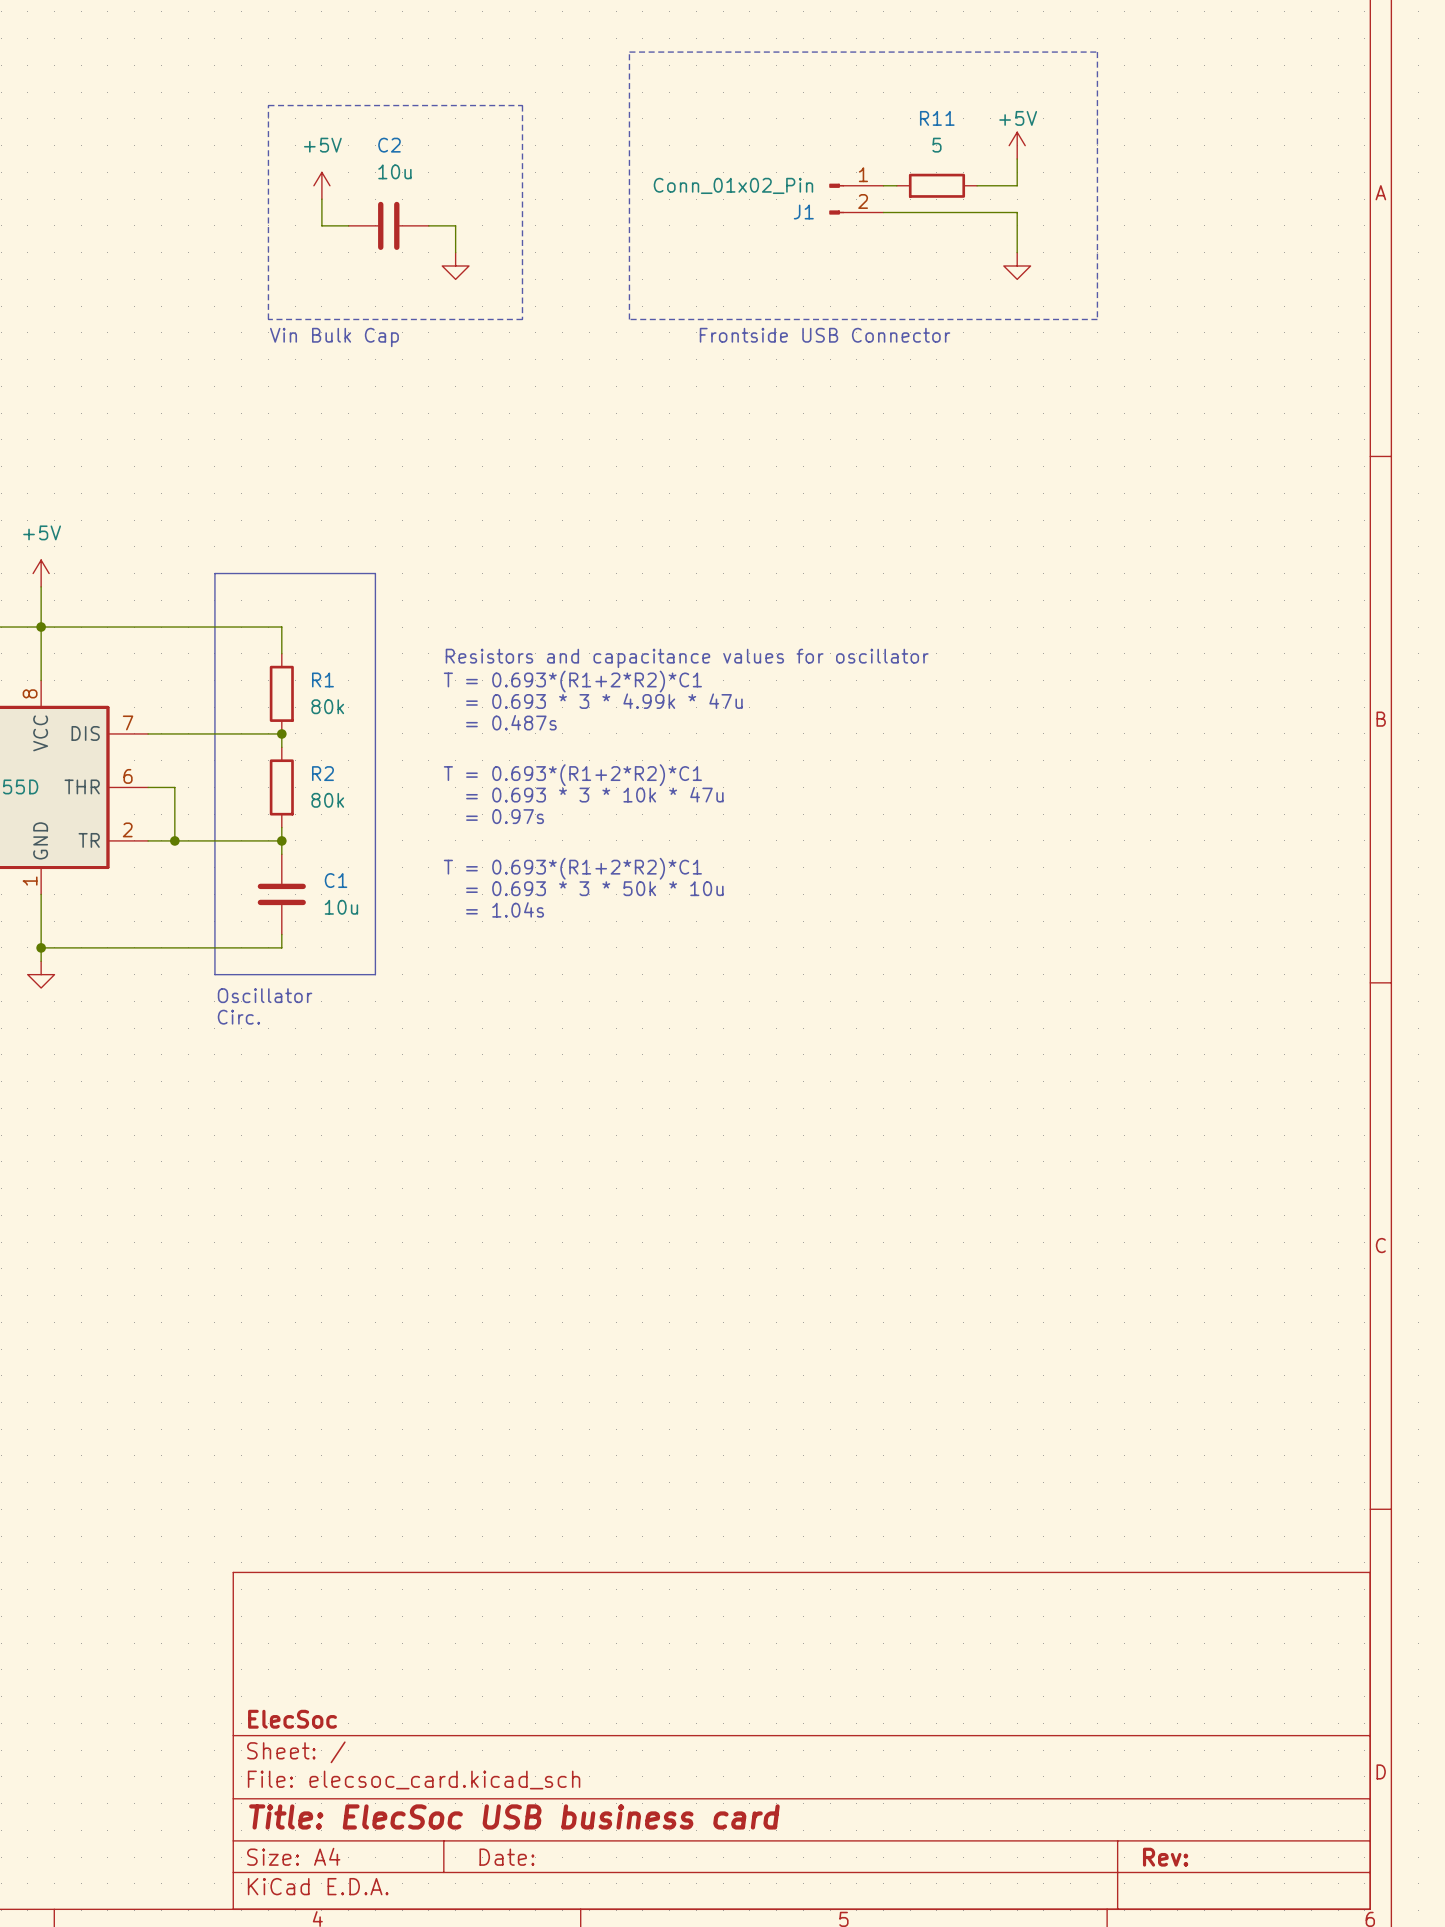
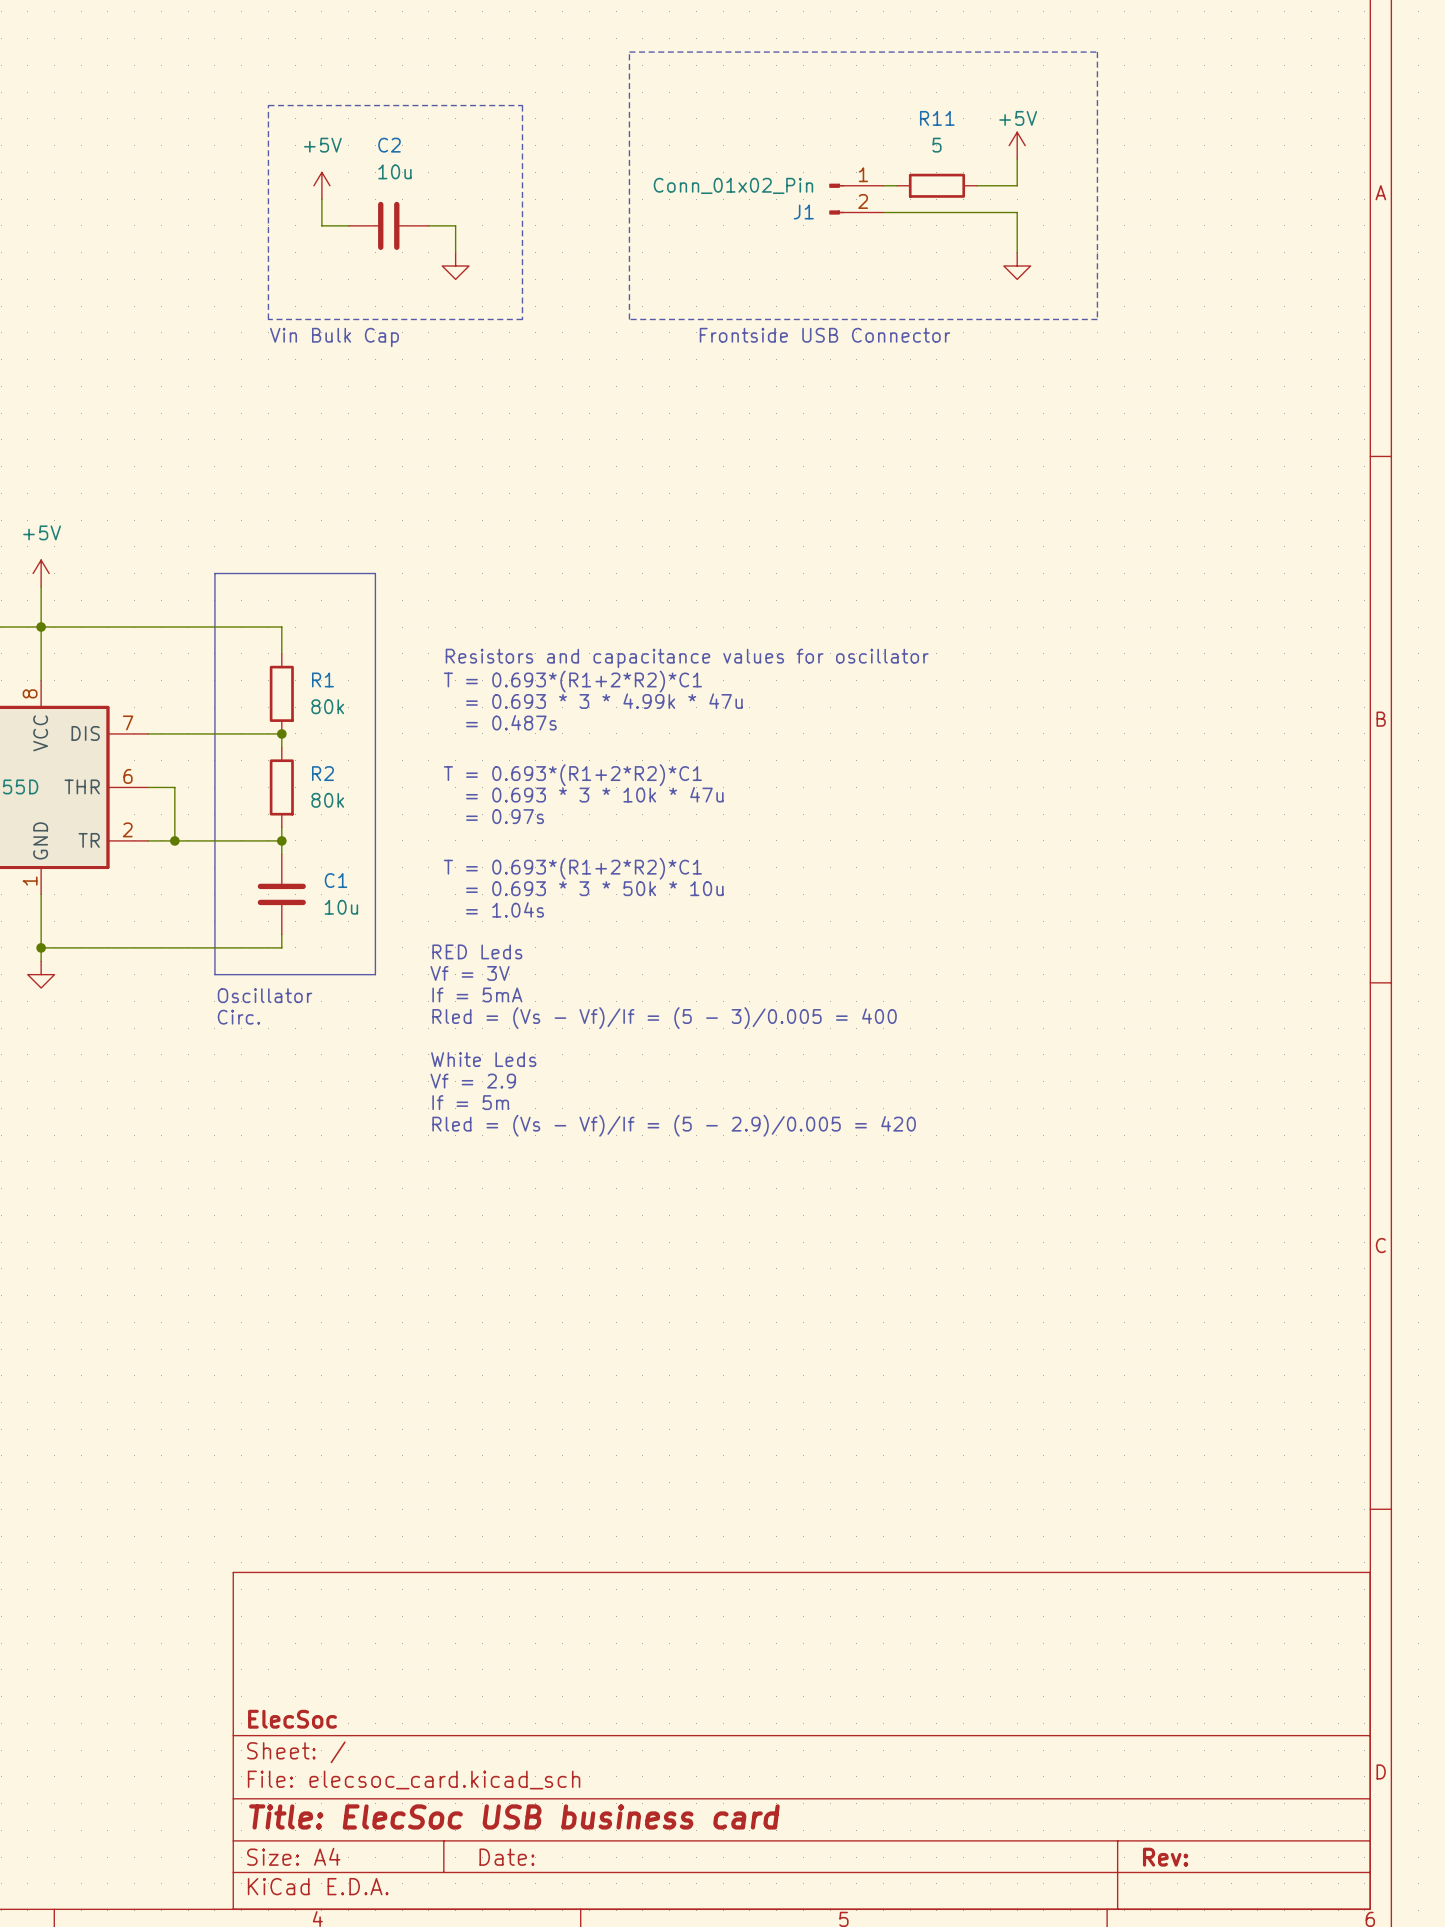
text: none -> RED Leds (477, 951)
text: none -> Vf = 3V (470, 973)
text: none -> If = 5mA (477, 994)
text: none -> Rled = (Vs - Vf)/If = (5 - 3)/0.005 = 400 (664, 1018)
text: none -> White Leds (483, 1059)
text: none -> Vf = 2.9 (473, 1081)
text: none -> If = 5m (470, 1102)
text: none -> Rled = (Vs - Vf)/If = (5 - 2.9)/0.005 = 420 (674, 1125)

